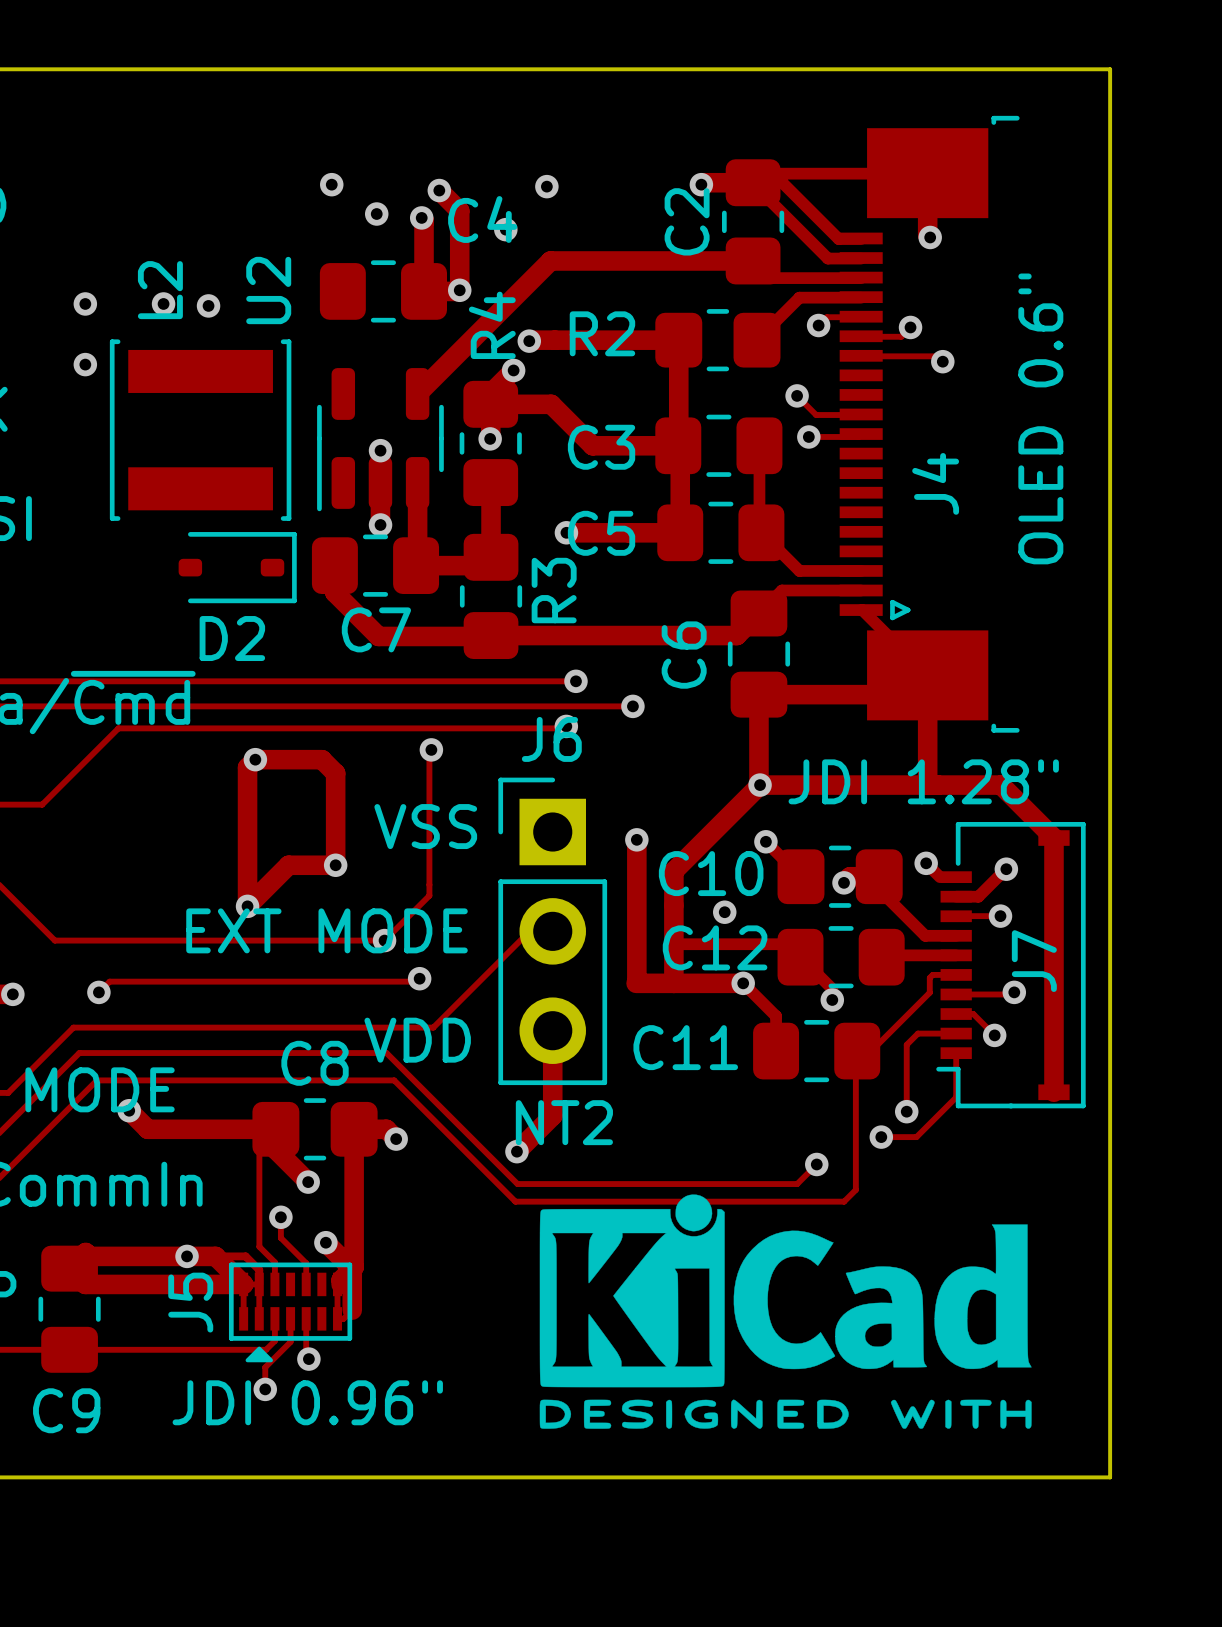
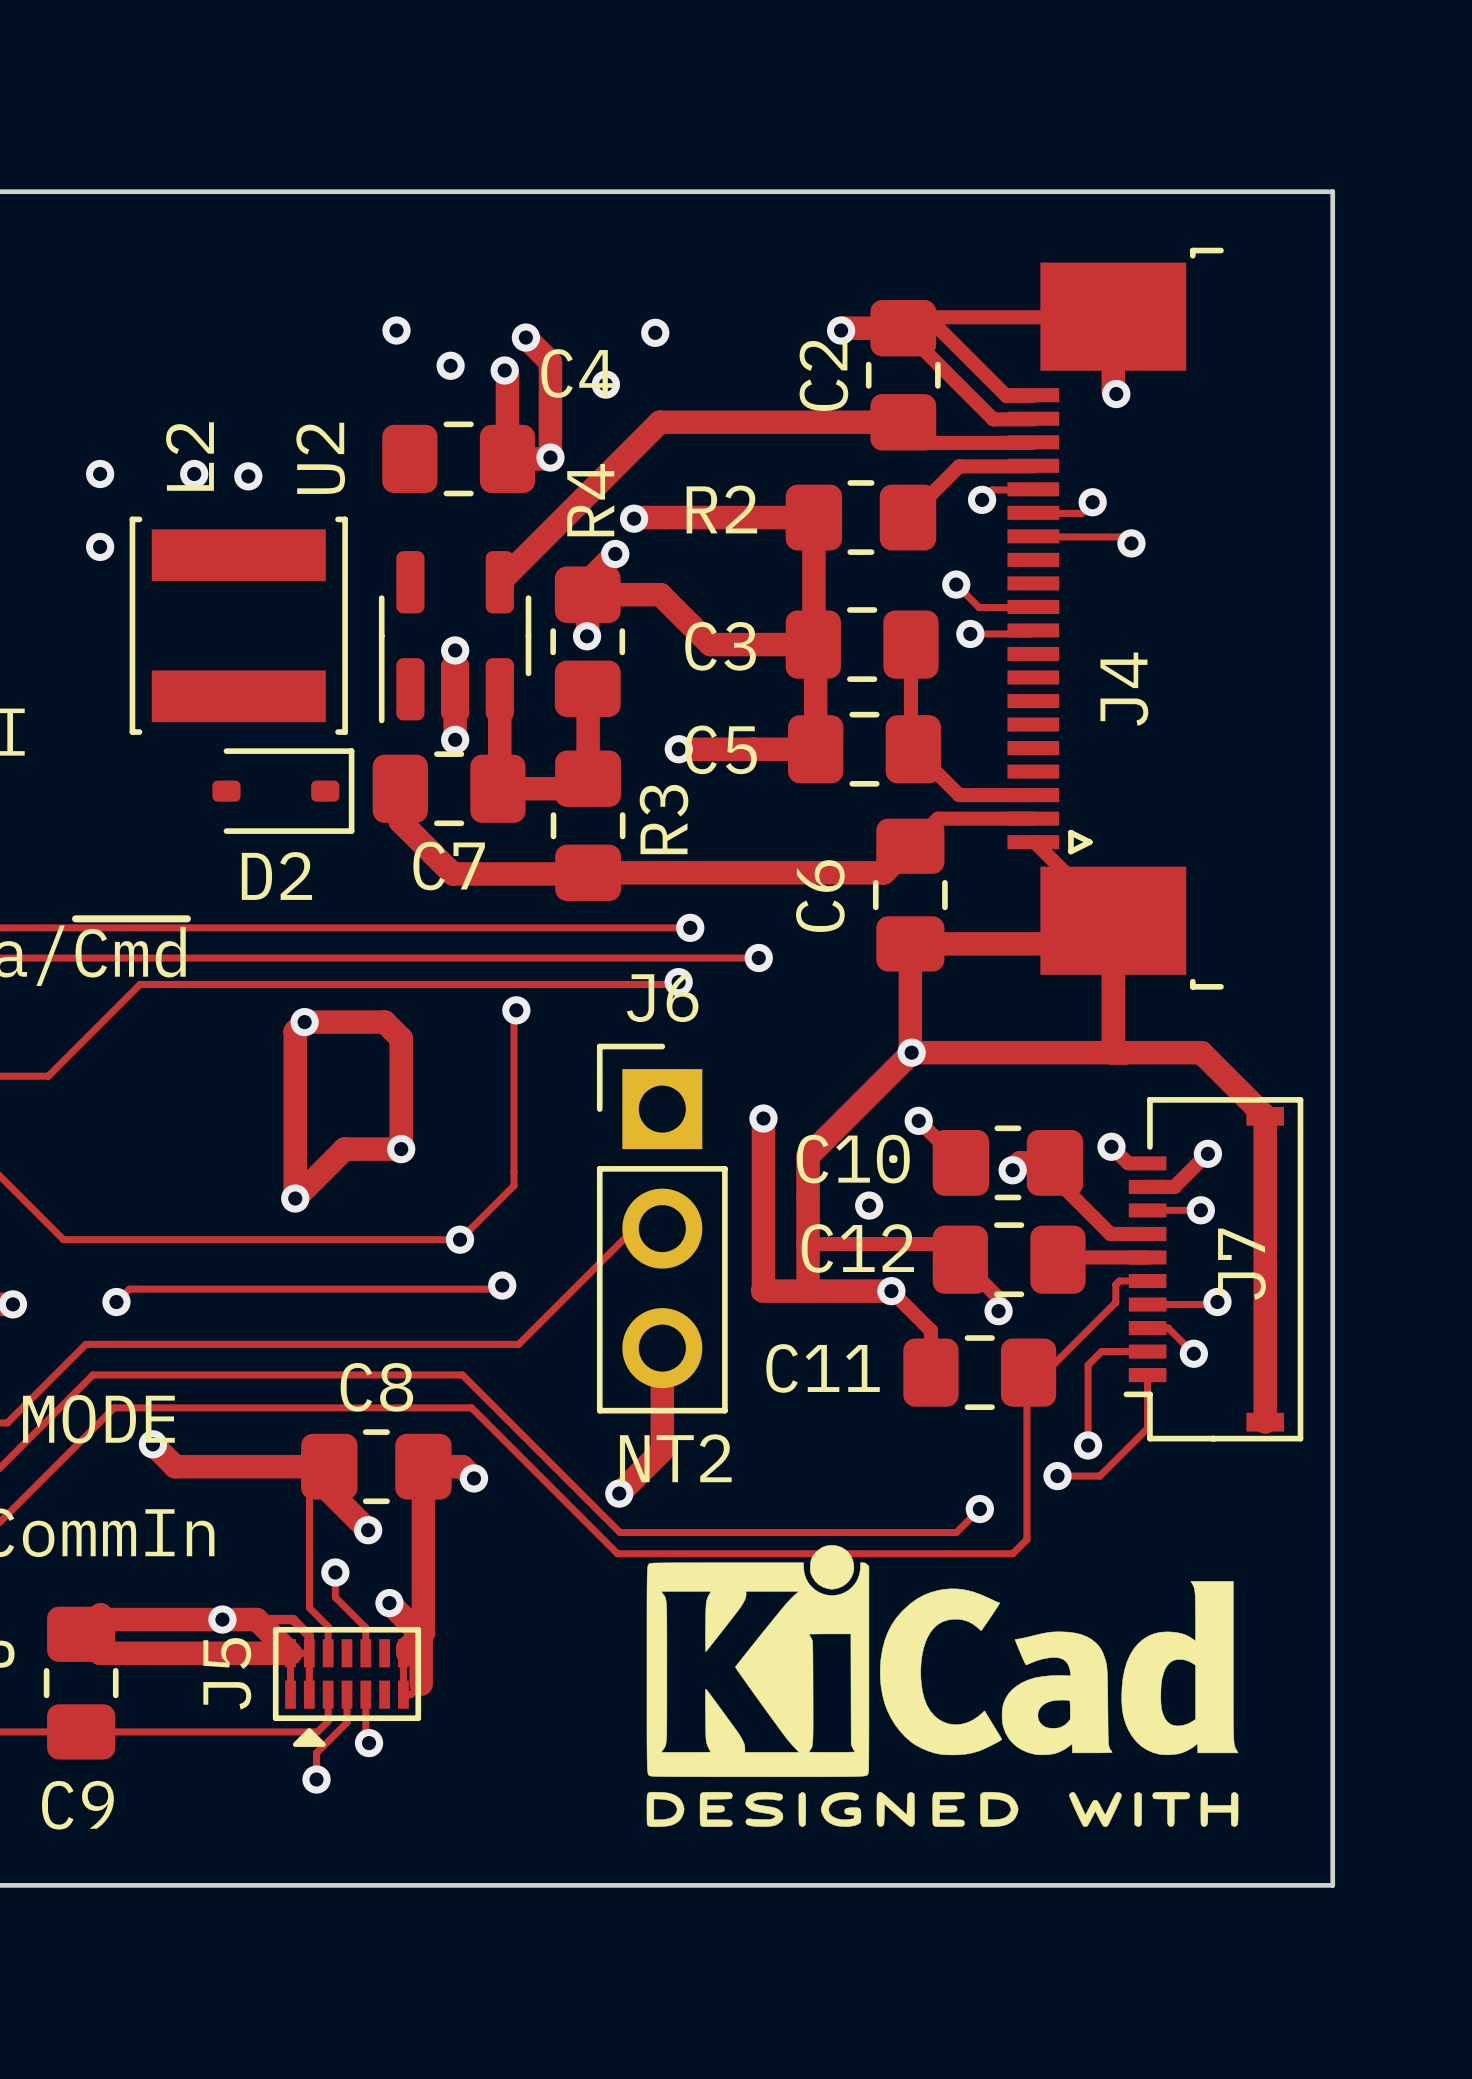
text: OLED 0.6" (1040, 418) -> none
text: JDI 1.28" (923, 781) -> none
text: VSS (425, 826) -> none
text: EXT MODE (327, 930) -> none
text: VDD (417, 1040) -> none
text: JDI 0.96" (307, 1402) -> none

